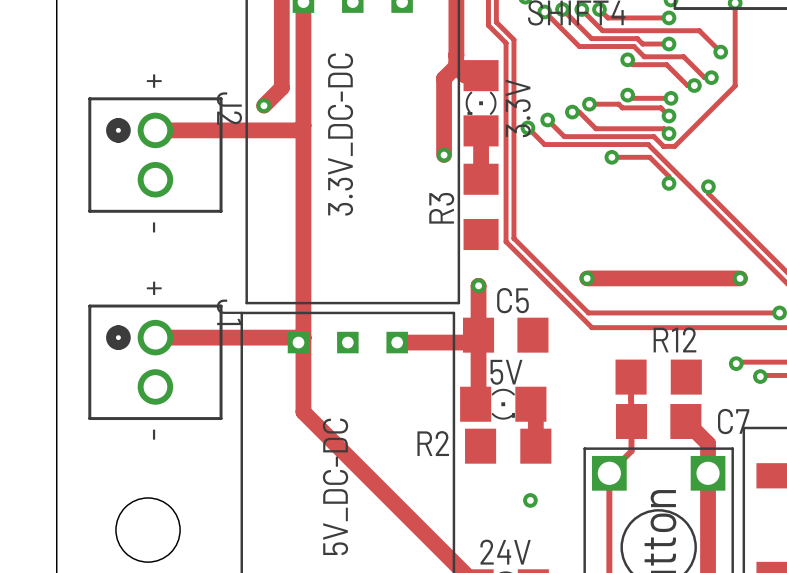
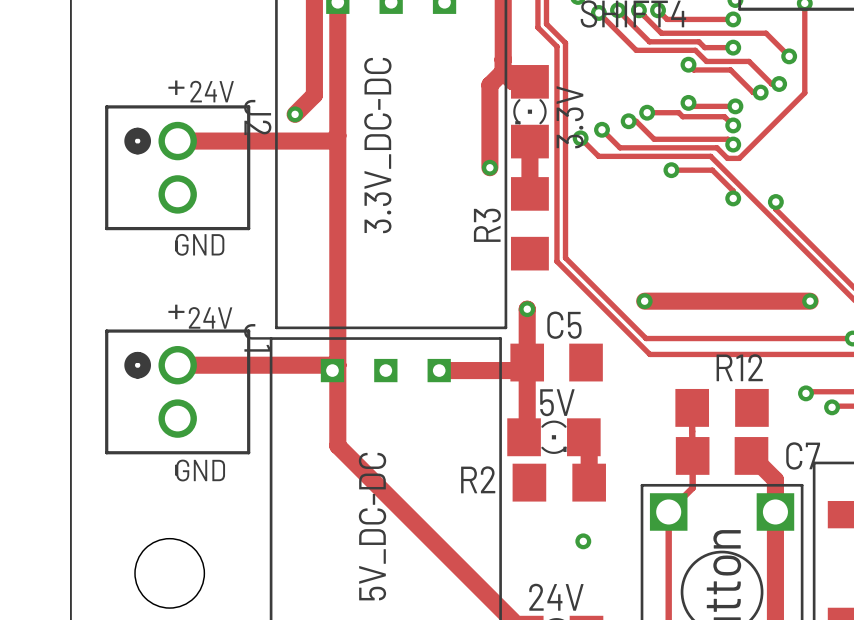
text: none -> 24V (212, 91)
text: none -> GND (199, 244)
text: none -> 24V (210, 317)
text: none -> GND (200, 470)

